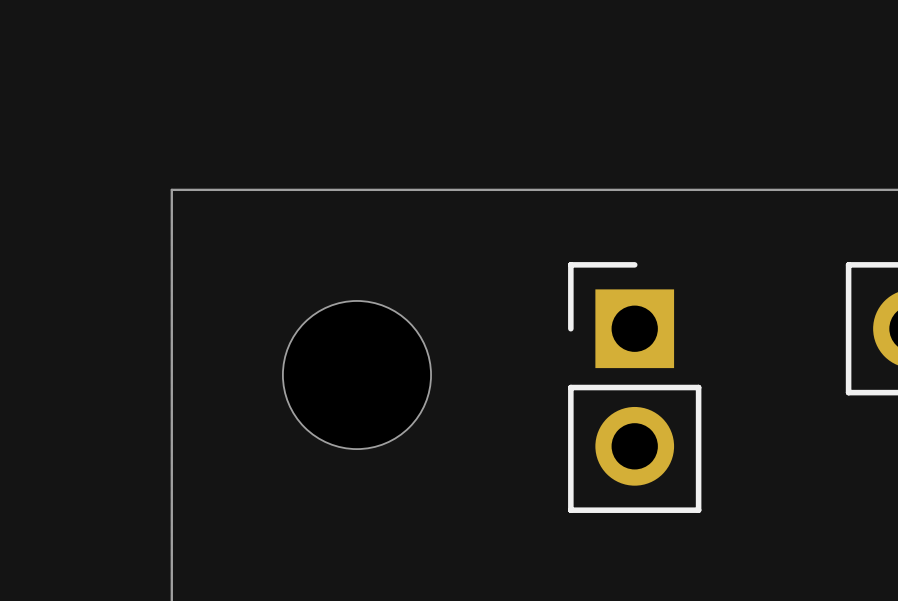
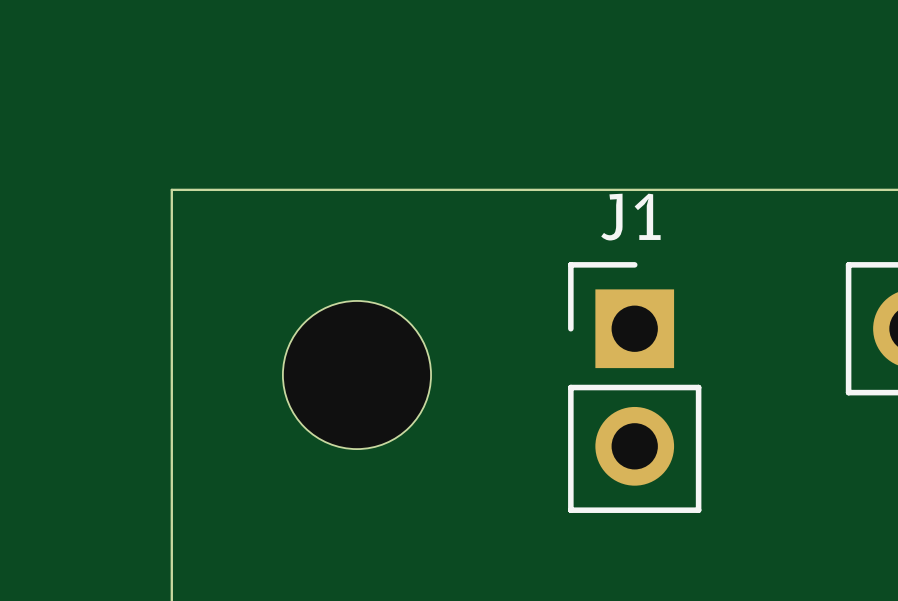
J1 name: none -> J1 (630, 217)

